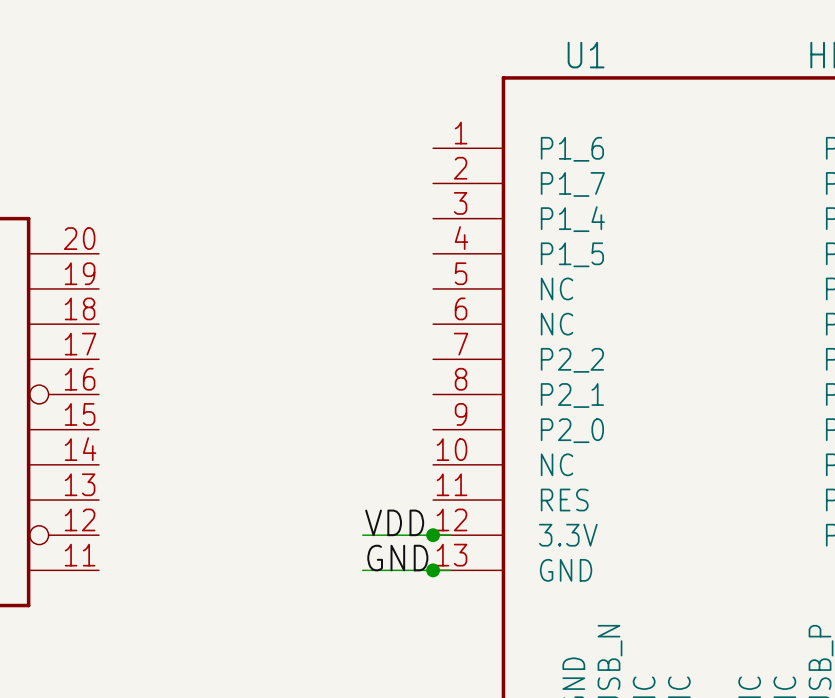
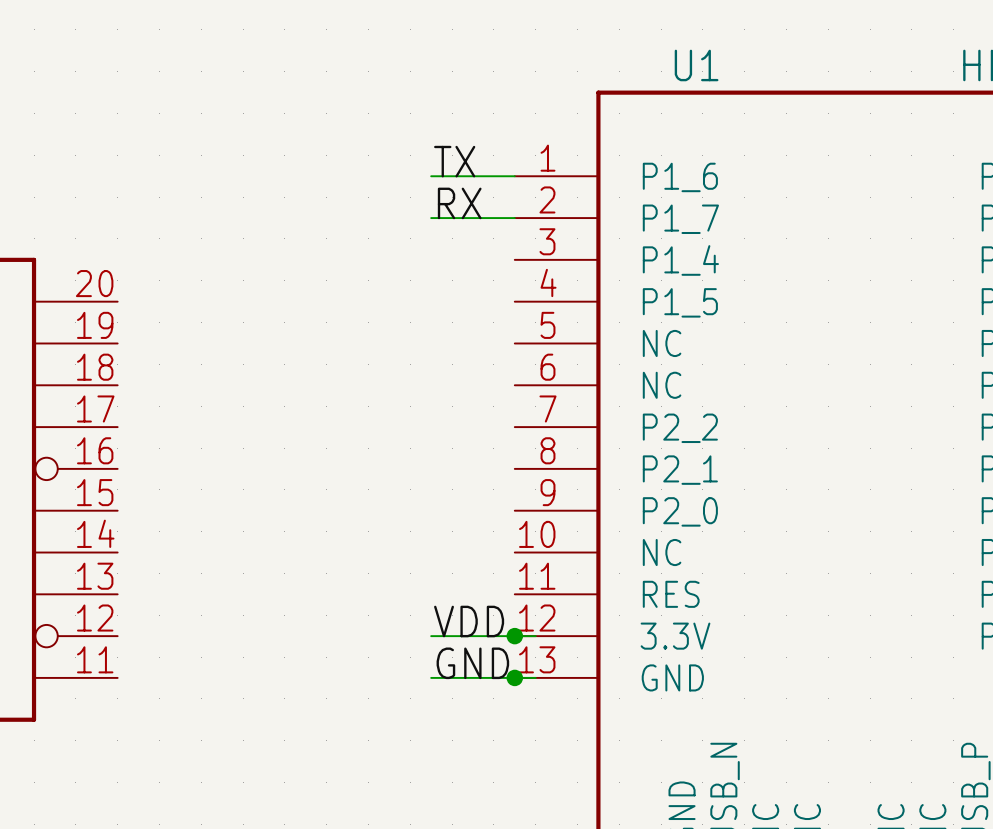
label: none -> TX (454, 161)
wire: none -> (431, 176) (514, 176)
label: none -> RX (459, 203)
wire: none -> (431, 218) (514, 218)

